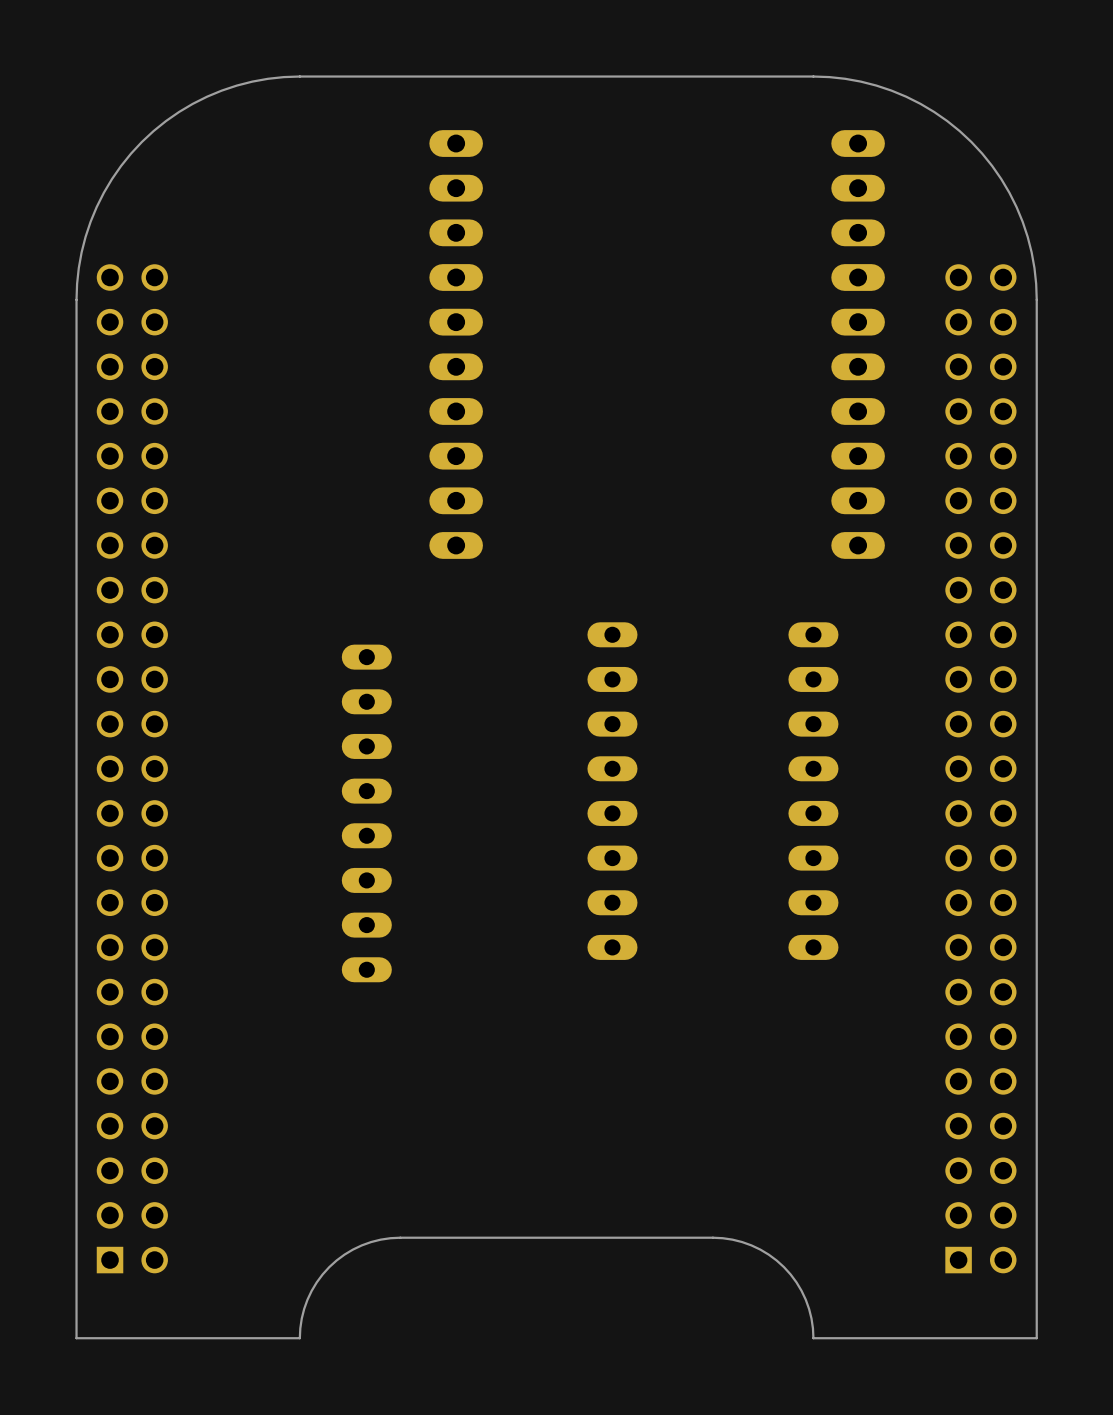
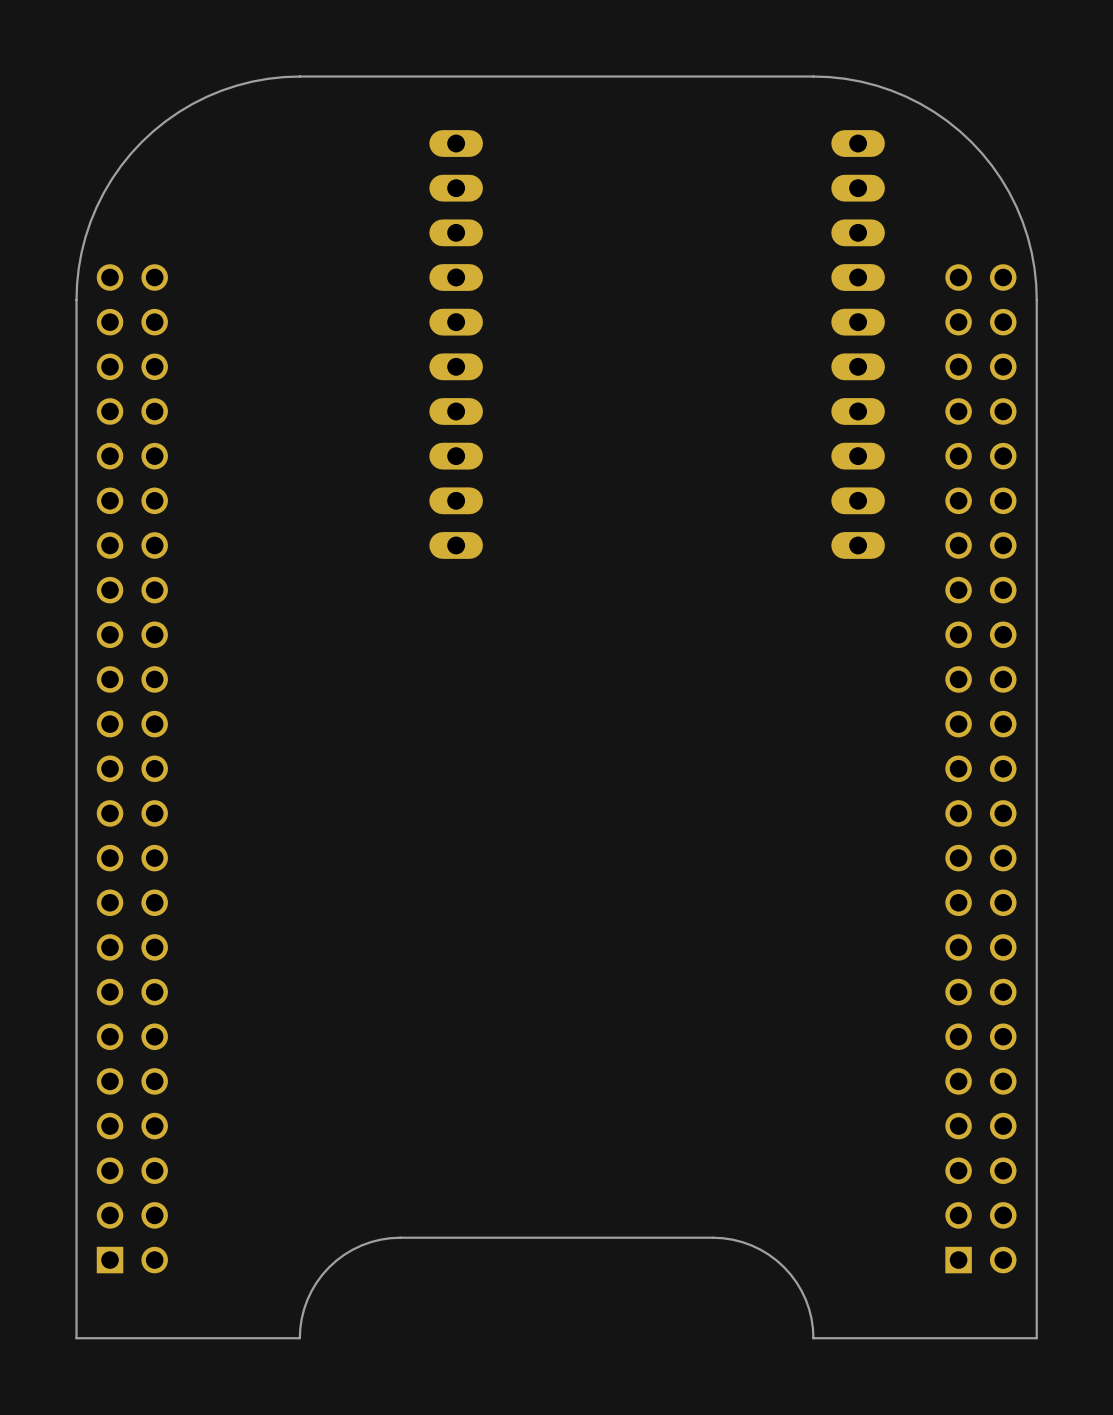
part: (612, 791) -> none
part: (813, 791) -> none
part: (366, 813) -> none

